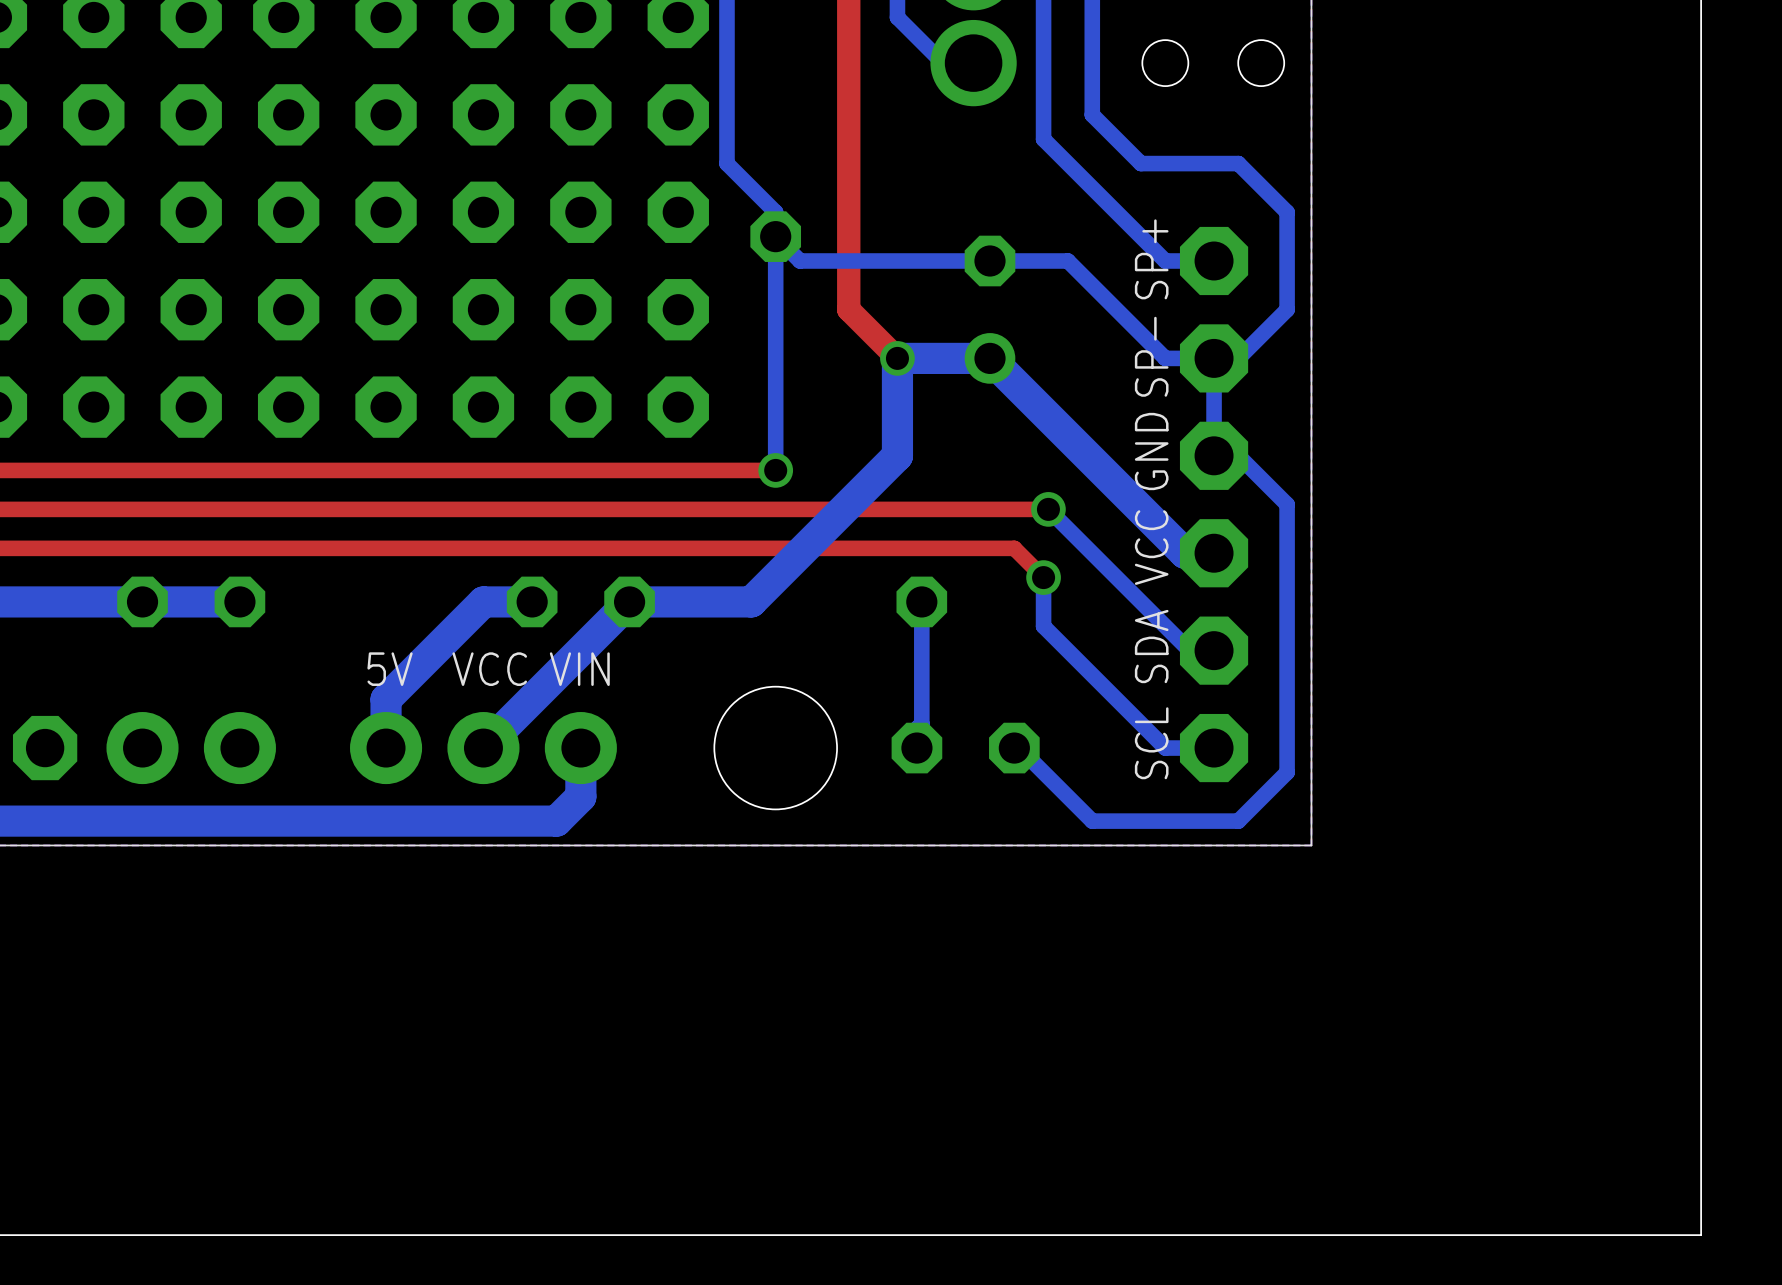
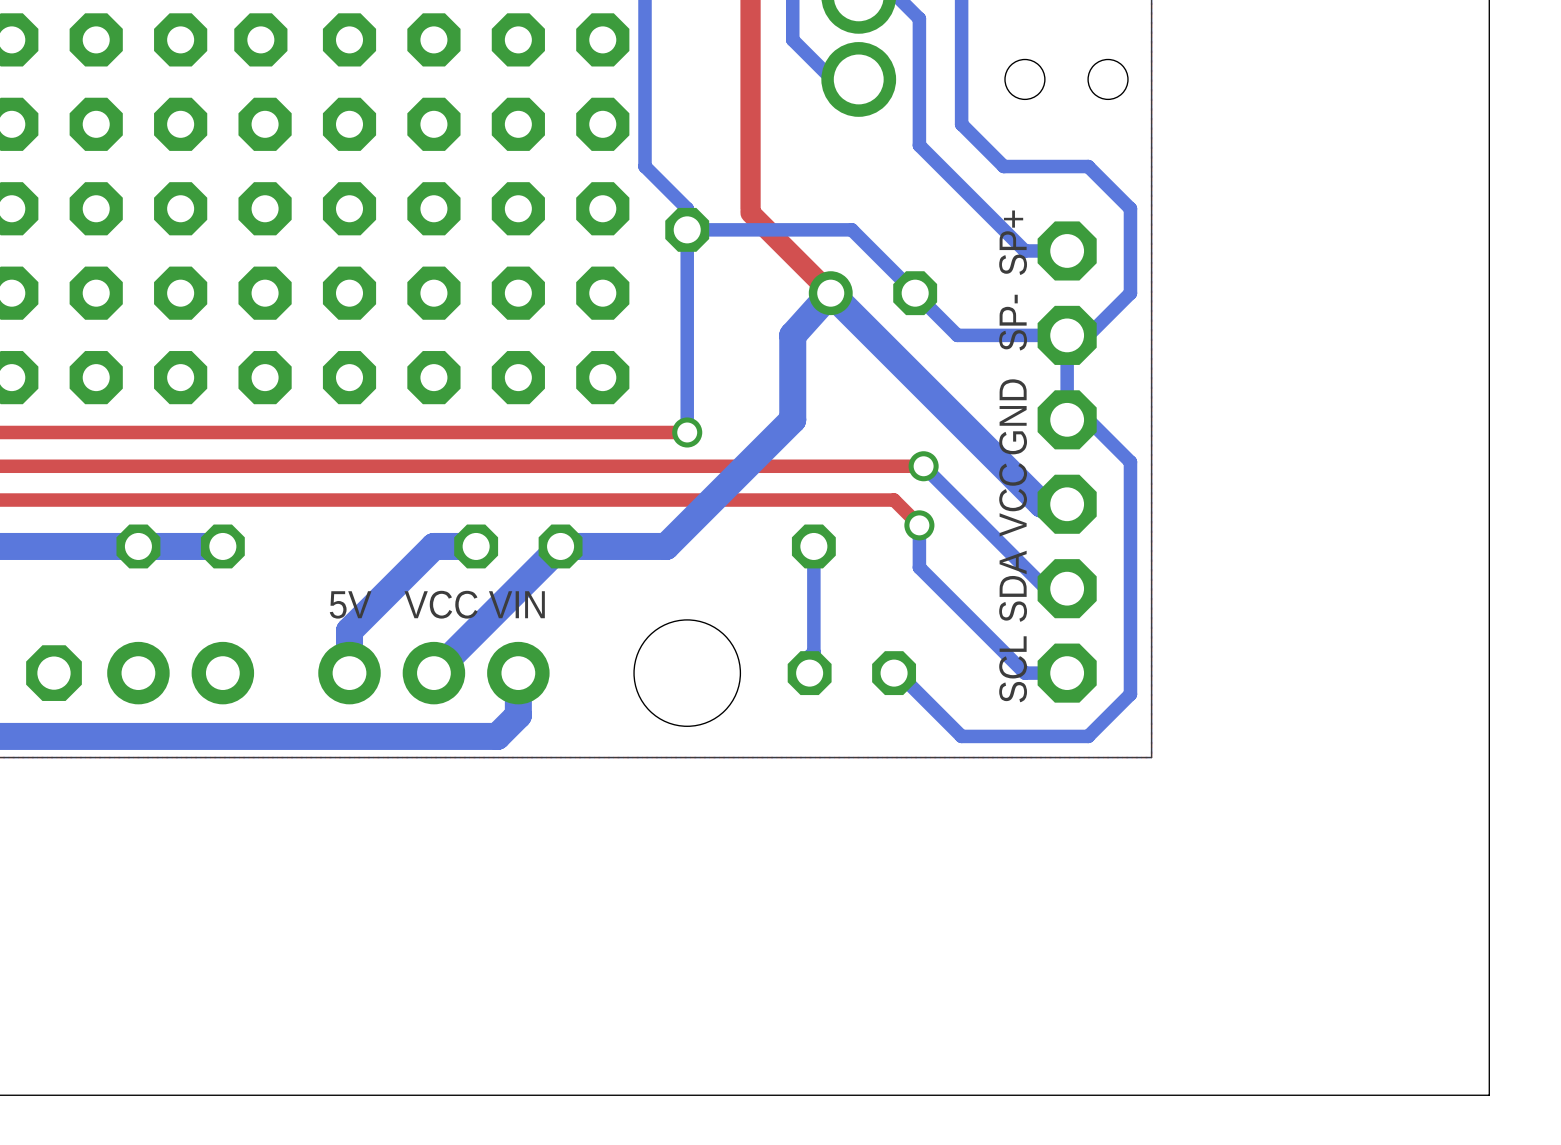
top track: (848, 212) (848, 309) (897, 358) -> none
top track: none -> (750, 212) (830, 293)
bottom track: (775, 236) (800, 260) (1067, 260) (1165, 358) -> (687, 229) (851, 229) (957, 335) (1024, 335)
part rotation: 0° (989, 309) -> 90° clockwise (872, 293)
via: (897, 358) -> none
bottom track: (989, 358) (897, 358) -> (872, 335) (830, 293) (792, 335)

